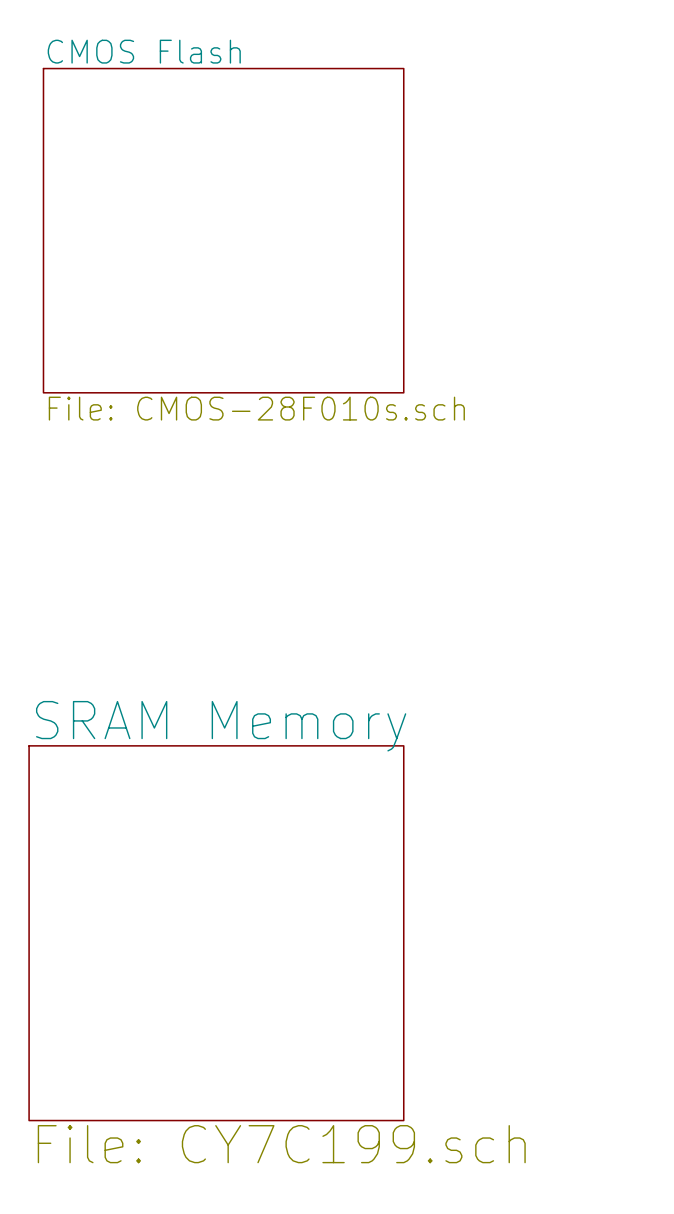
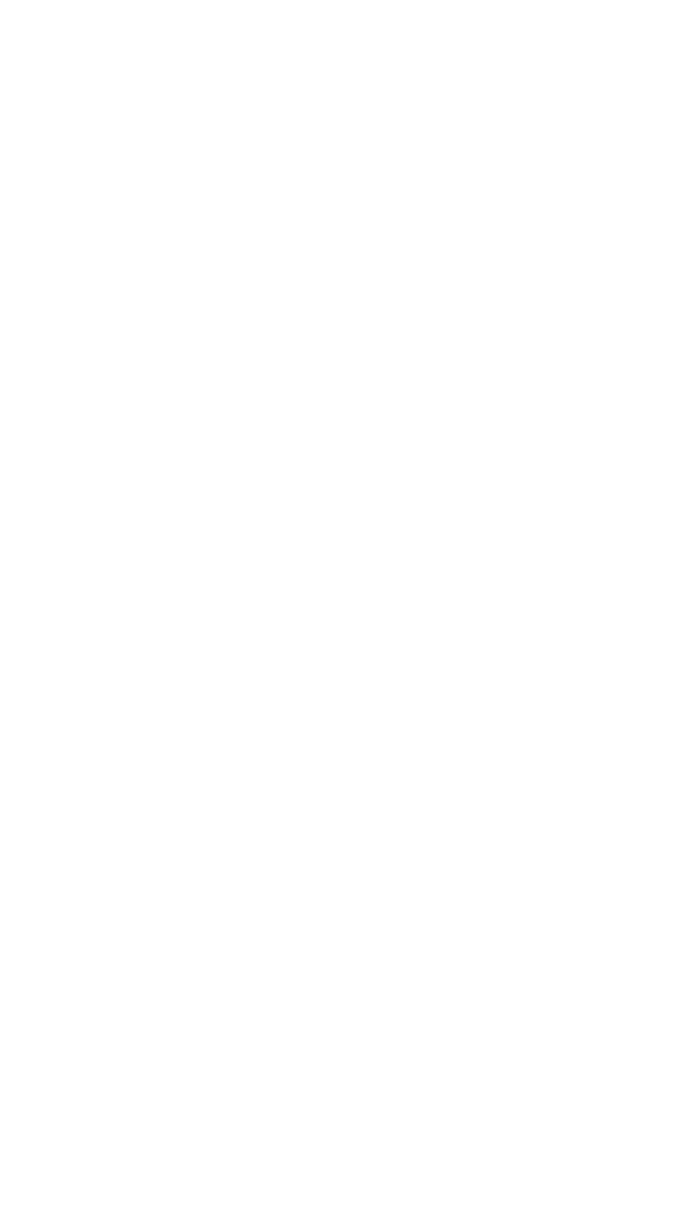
sheet CMOS Flash: File: CMOS-28F010s.sch (223, 230) -> none
sheet SRAM Memory: File: CY7C199.sch (216, 933) -> none

